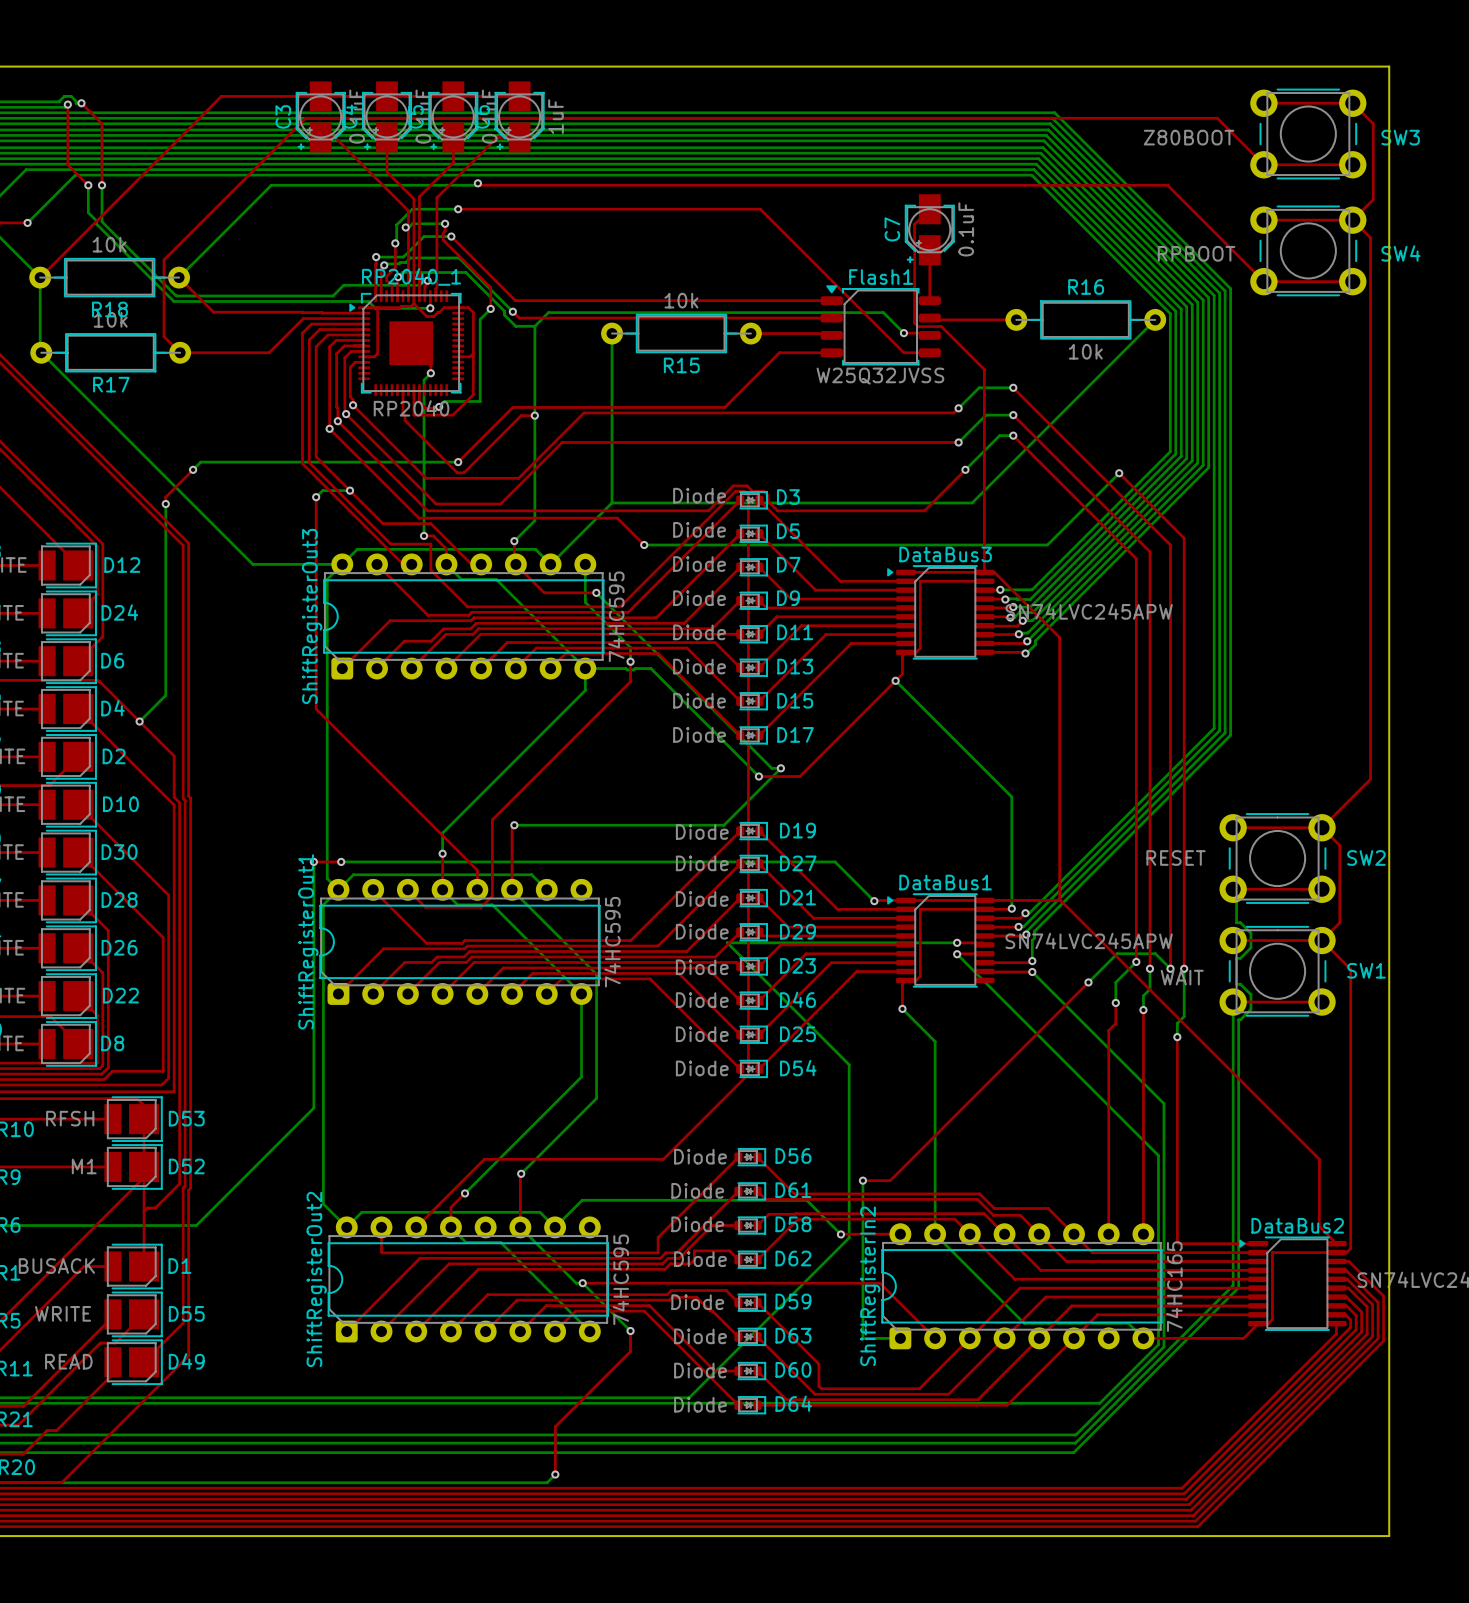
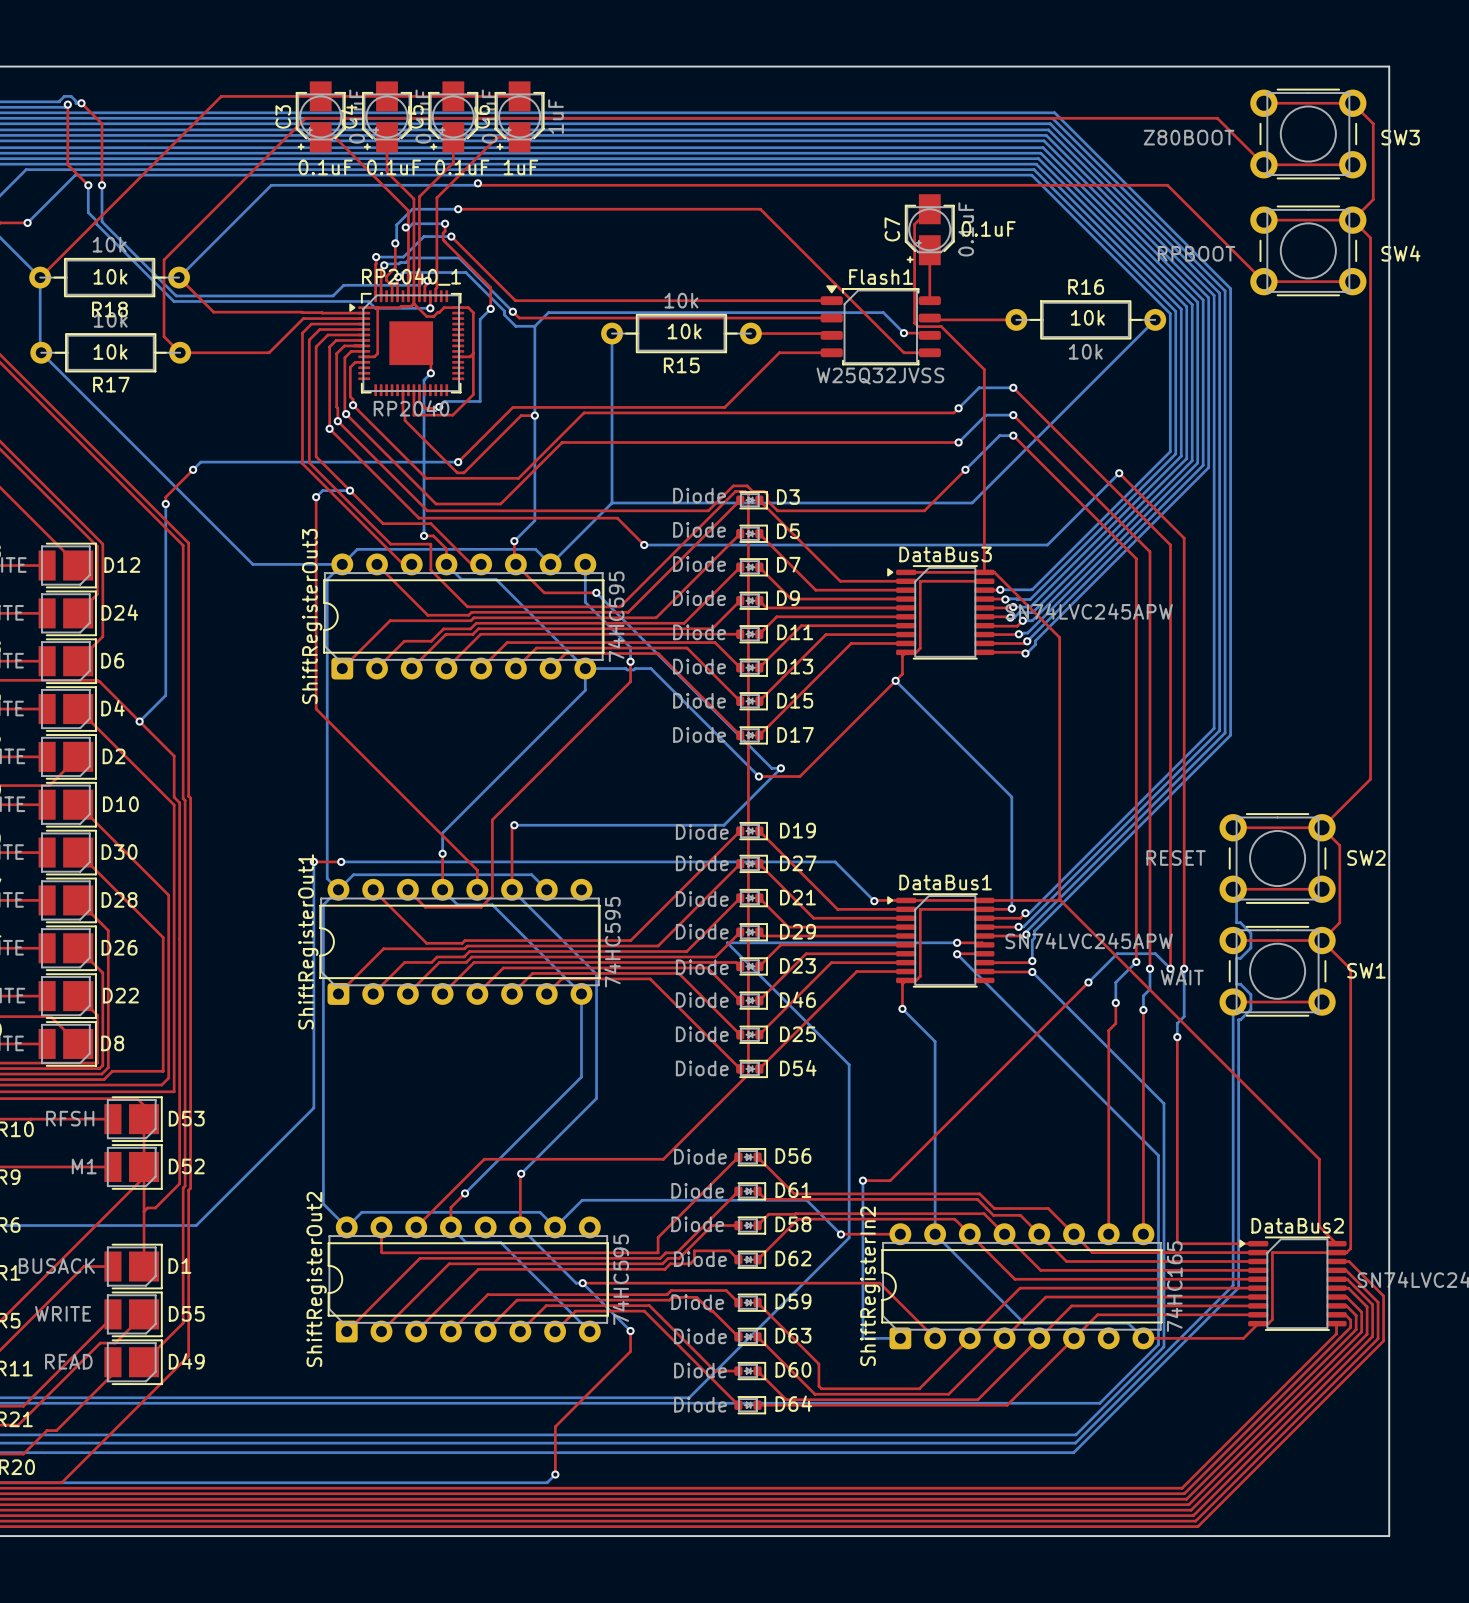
text: none -> 0.1uF (325, 167)
text: none -> 0.1uF (393, 167)
text: none -> 0.1uF (462, 167)
text: none -> 1uF (520, 167)
text: none -> 0.1uF (988, 228)
text: none -> 10k (110, 276)
text: none -> 10k (1087, 317)
text: none -> 10k (684, 331)
text: none -> 10k (110, 351)

